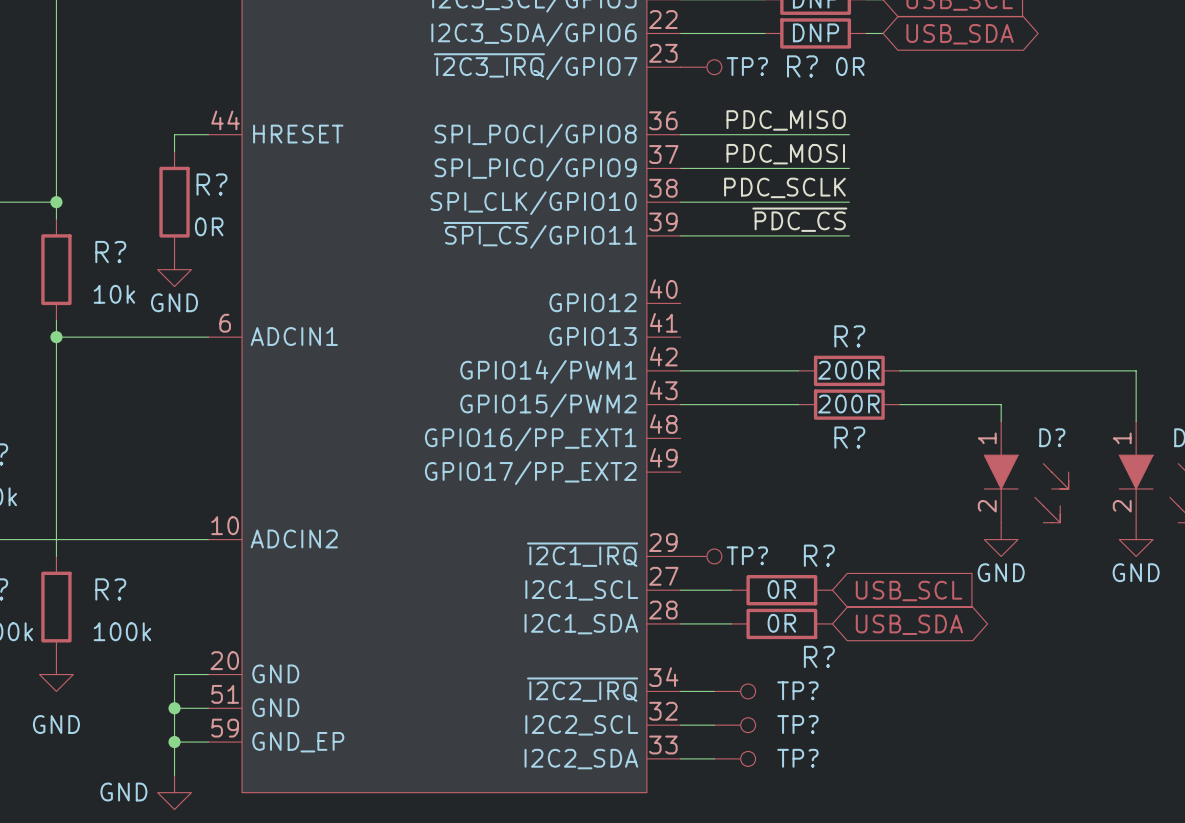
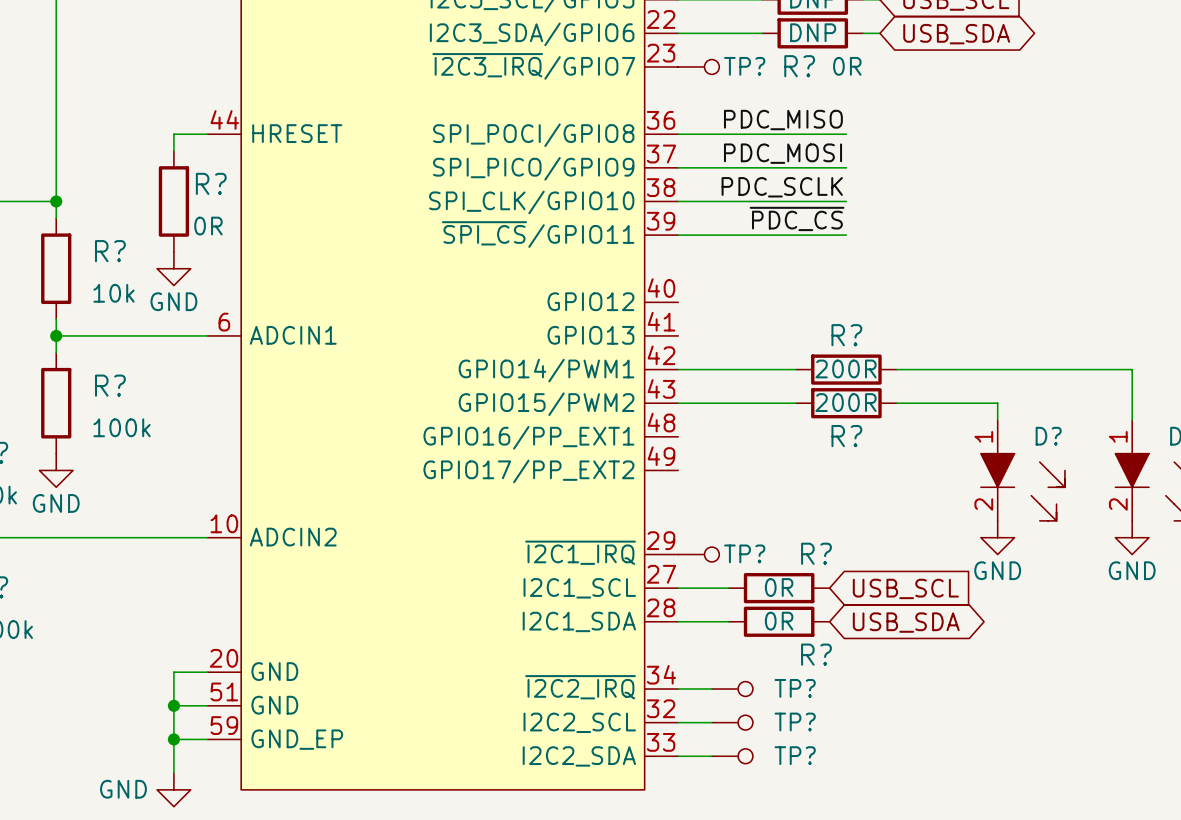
wire: (56, 354) (56, 556) -> none
R? position: (56, 607) -> (56, 403)
power symbol position: GND (56, 674) -> GND (56, 470)
power symbol text position: GND (56, 724) -> GND (56, 503)

